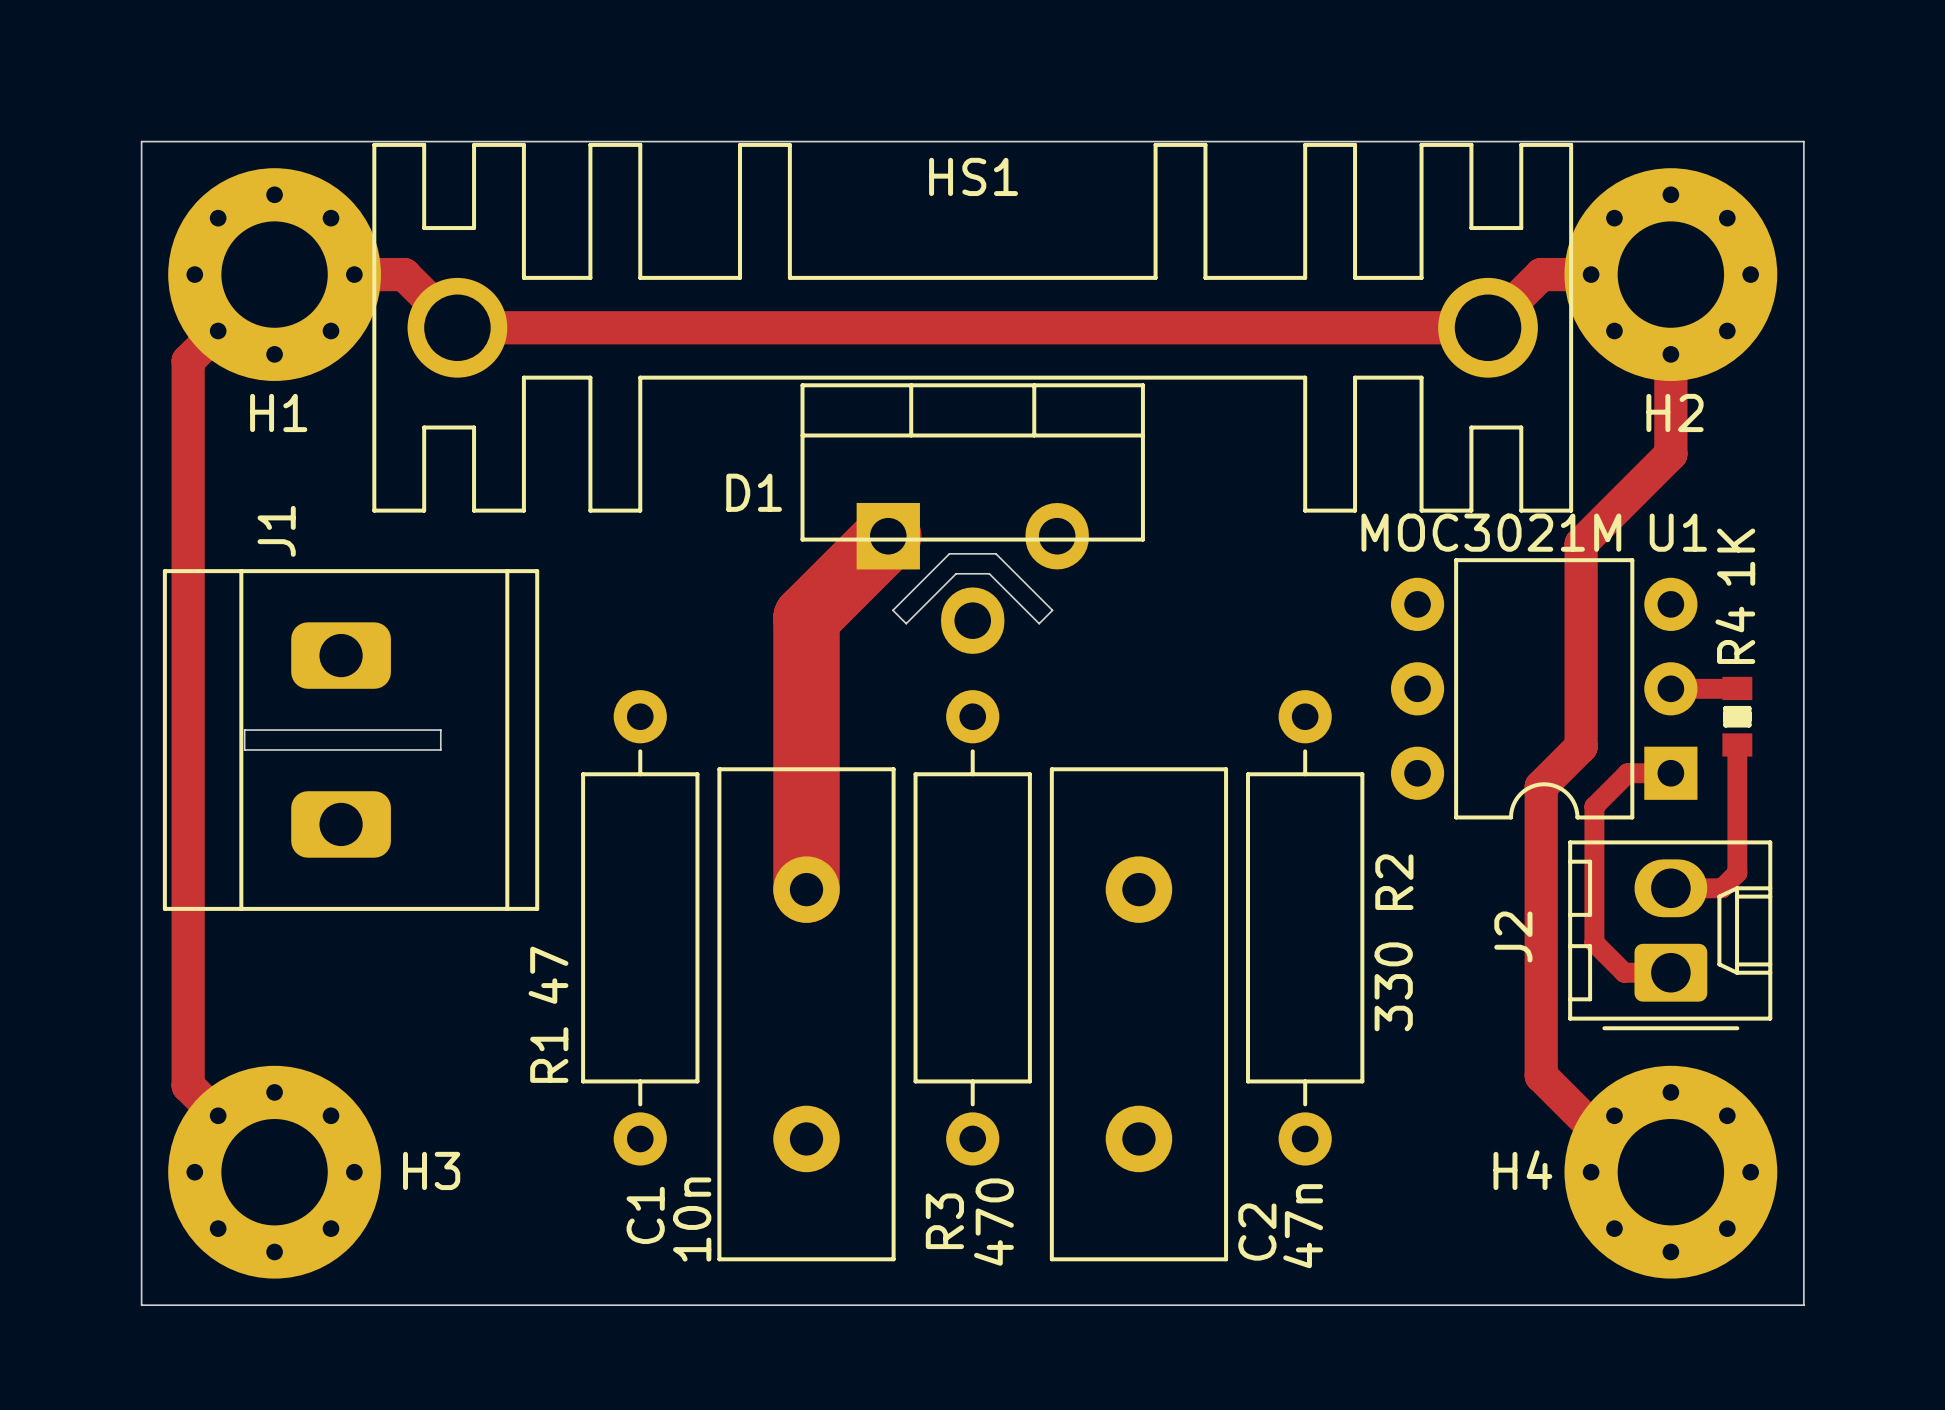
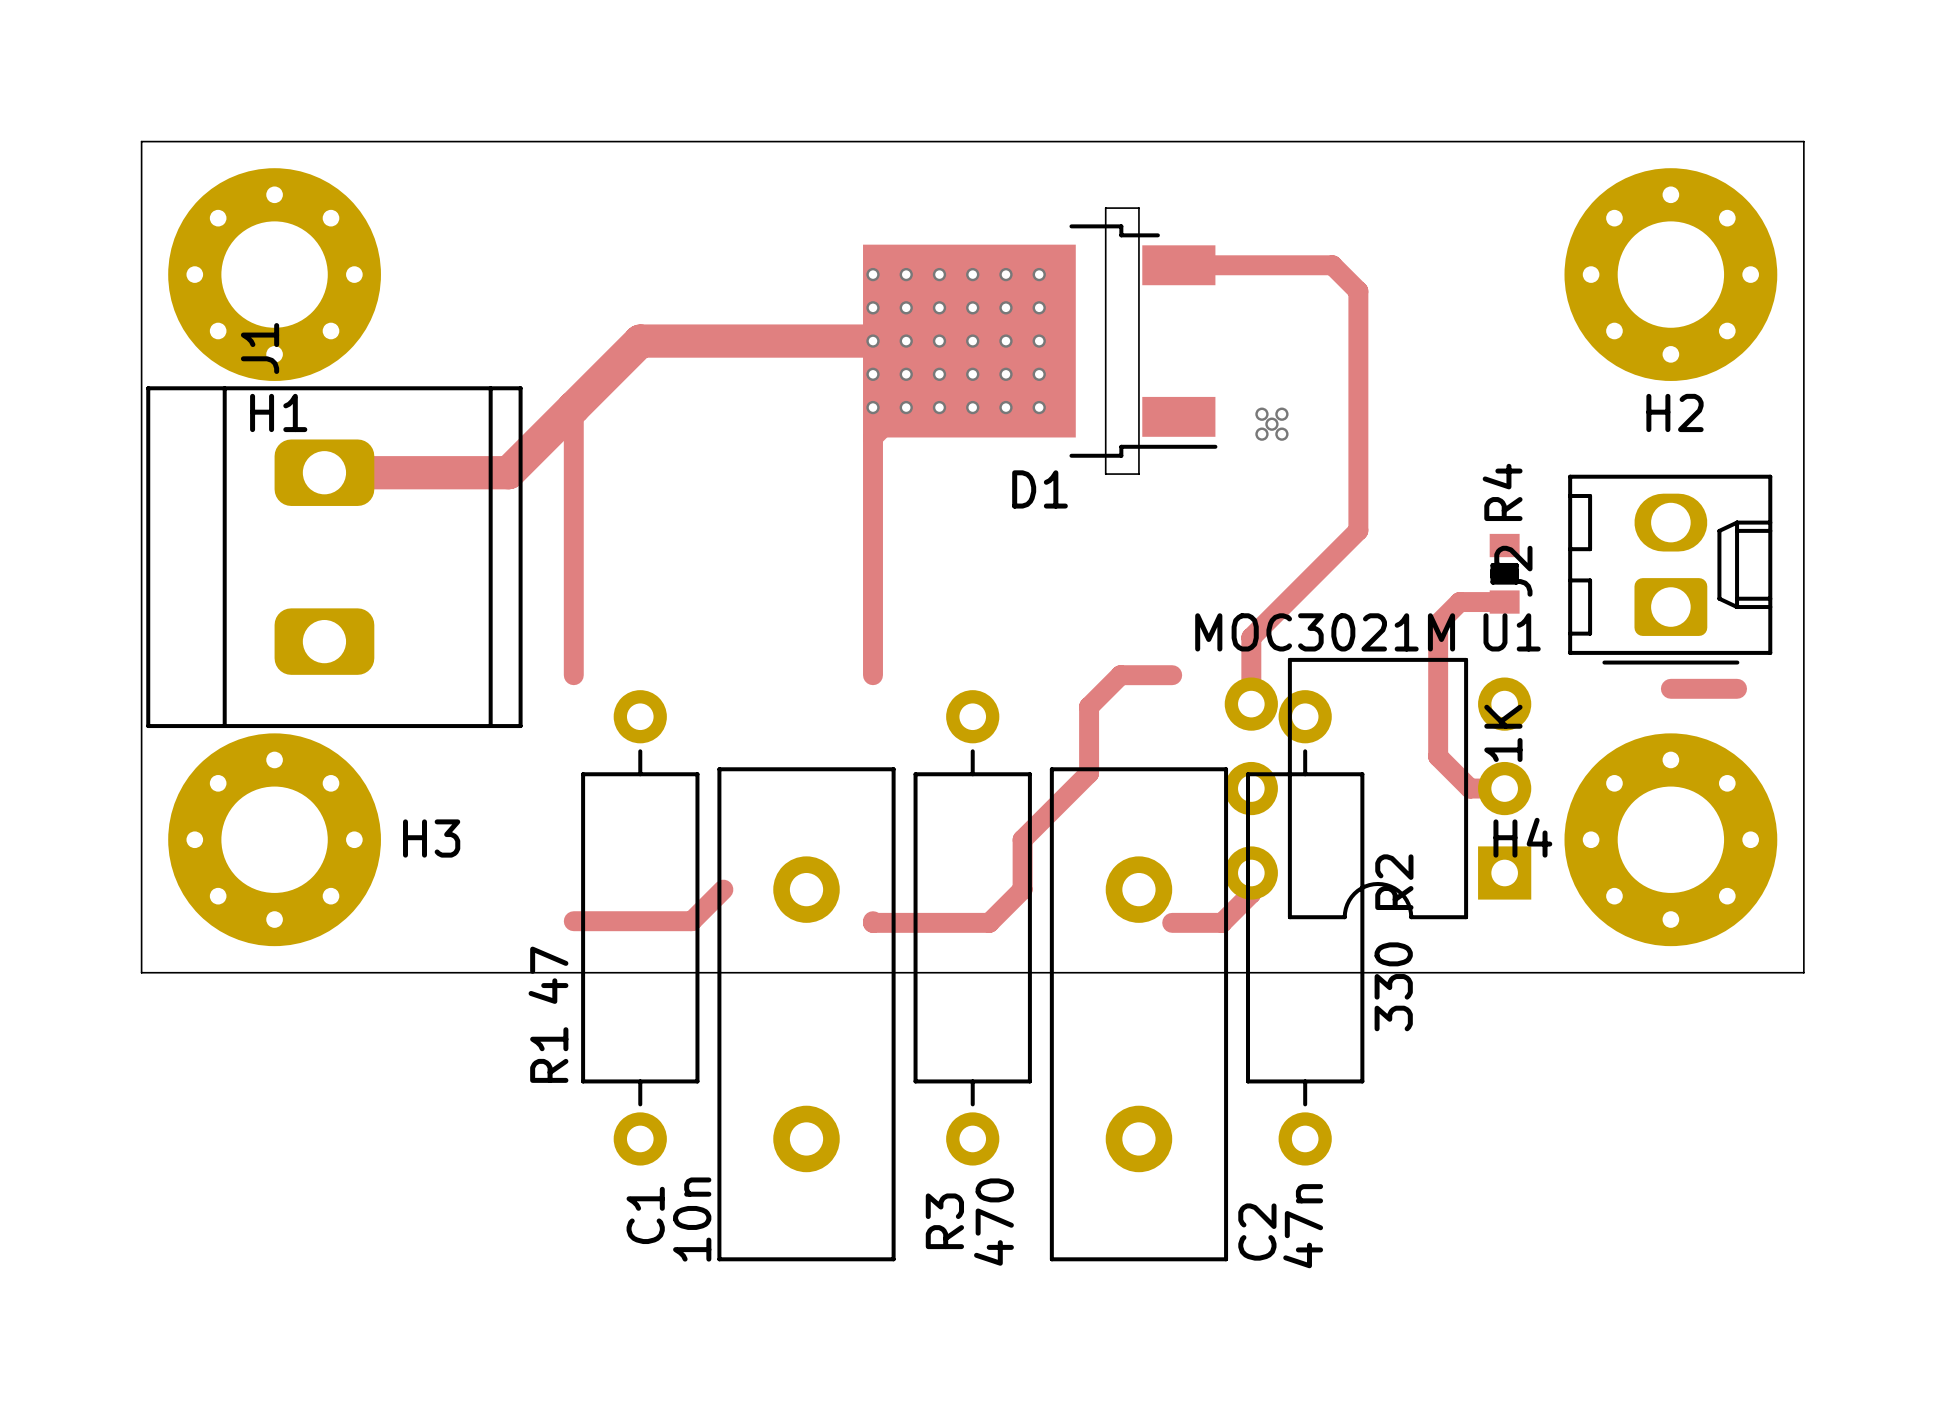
board edge: none -> (1105, 208) (1105, 474) (1138, 474) (1138, 208) (1105, 208)
track: none -> (1178, 265) (1332, 265) (1358, 291) (1358, 530) (1251, 637) (1251, 704)
via: none -> (872, 274)
via: none -> (906, 274)
via: none -> (939, 274)
via: none -> (972, 274)
via: none -> (1005, 274)
via: none -> (1039, 274)
via: none -> (872, 307)
via: none -> (906, 307)
via: none -> (939, 307)
via: none -> (972, 307)
via: none -> (1005, 307)
via: none -> (1039, 307)
HS1: (972, 327) -> none
via: none -> (872, 341)
via: none -> (906, 341)
via: none -> (939, 341)
via: none -> (972, 341)
via: none -> (1005, 341)
via: none -> (1039, 341)
via: none -> (872, 374)
via: none -> (906, 374)
via: none -> (939, 374)
via: none -> (972, 374)
via: none -> (1005, 374)
via: none -> (1039, 374)
D1 footprint: [800, 383, 1145, 654] -> [863, 224, 1218, 458]
track: none -> (573, 407) (573, 675)
via: none -> (872, 407)
via: none -> (906, 407)
via: none -> (939, 407)
via: none -> (972, 407)
via: none -> (1005, 407)
via: none -> (1039, 407)
via: none -> (1261, 414)
via: none -> (1281, 414)
via: none -> (1271, 424)
via: none -> (1261, 434)
via: none -> (1281, 434)
track: none -> (324, 472) (508, 472) (640, 341) (969, 341) (872, 437) (872, 675)
D1 name position: D1 (754, 492) -> D1 (1040, 489)
track: (888, 536) (806, 618) (806, 889) -> none
board edge: (949, 553) (892, 610) (906, 623) (956, 573) (989, 573) (1039, 623) (1052, 610) (996, 553) (949, 553) -> none
R4 value position: 1K (1736, 557) -> 1K (1503, 733)
track: none -> (1504, 602) (1459, 602) (1438, 623) (1438, 756) (1470, 788) (1504, 788)
track: none -> (1172, 675) (1120, 675) (1089, 706) (1089, 773) (1022, 839) (1022, 889) (989, 922) (872, 922) (872, 921)
U1 position: (1544, 688) -> (1377, 788)
R4 position: (1737, 716) -> (1504, 573)
board edge: (244, 730) (440, 730) (440, 749) (244, 749) (244, 730) -> none
J1 position: (351, 740) -> (334, 557)
track: (1737, 745) (1737, 872) (1722, 888) (1670, 888) -> none
track: (1670, 773) (1627, 773) (1594, 806) (1594, 942) (1624, 972) (1670, 972) -> none
track: none -> (1251, 872) (1251, 893) (1222, 922) (1172, 922)
track: none -> (723, 889) (691, 921) (573, 921)
J2 position: (1670, 935) -> (1670, 569)
board edge: (141, 972) (141, 1305) (1803, 1305) (1803, 972) -> (141, 972) (1803, 972)
track: (274, 1172) (188, 1085) (188, 361) (274, 274) (404, 274) (457, 327) (1488, 327) (1541, 274) (1670, 274) (1670, 454) (1581, 543) (1581, 746) (1541, 786) (1541, 1075) (1637, 1172) (1670, 1172) -> none
H3 position: (274, 1172) -> (274, 839)
H4 position: (1670, 1172) -> (1670, 839)

